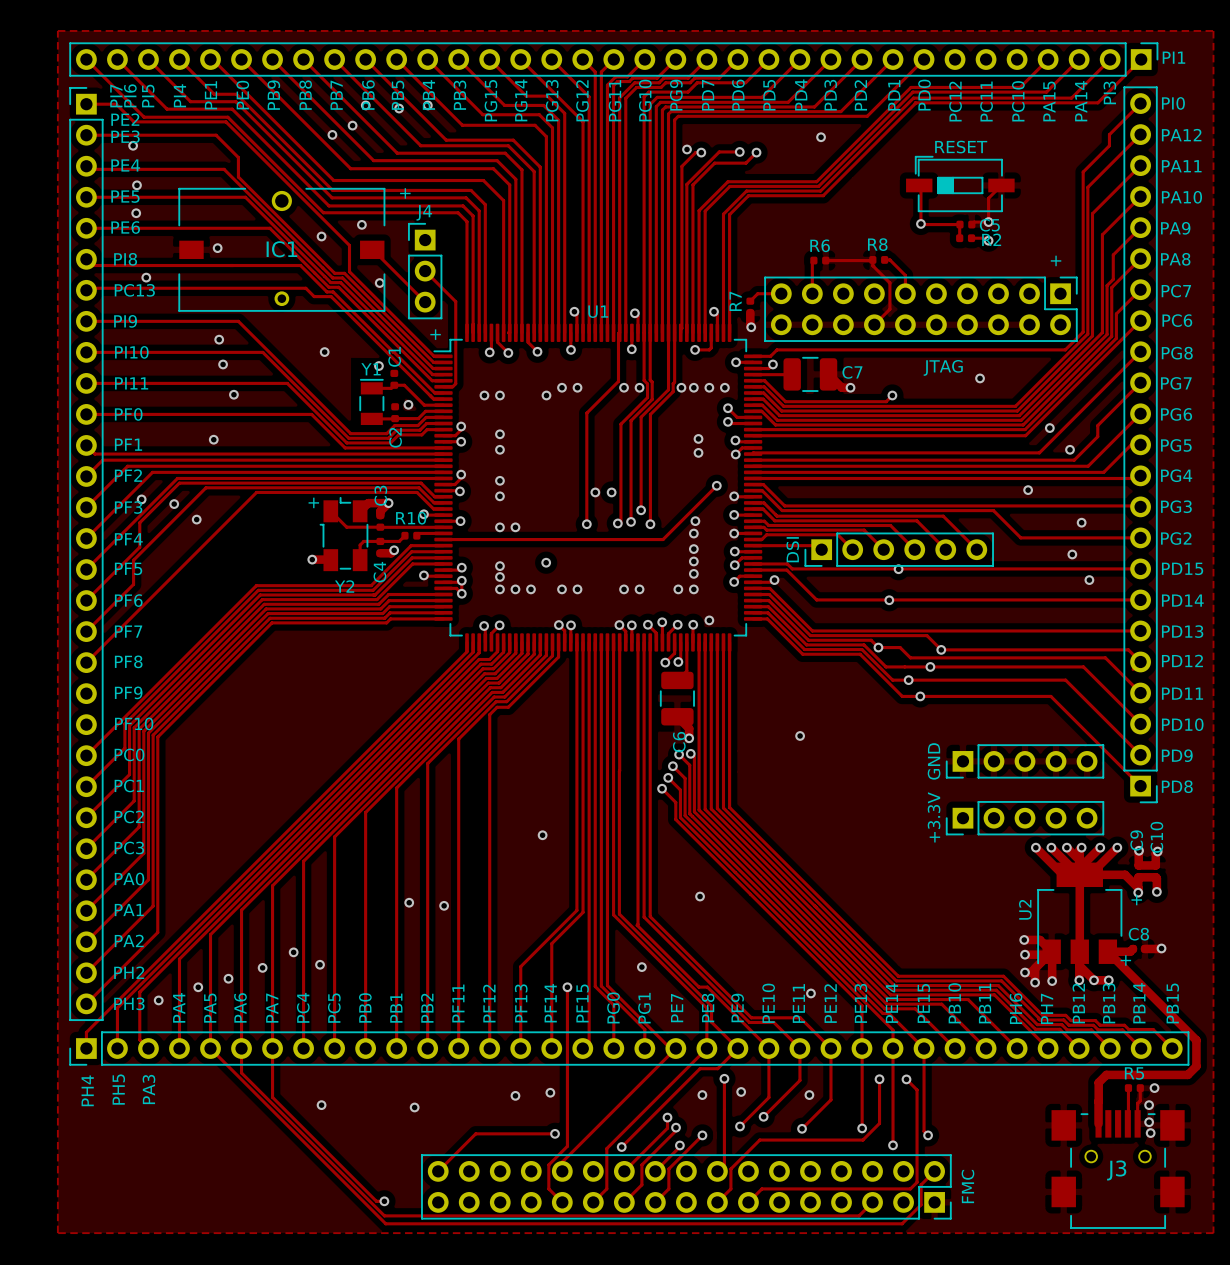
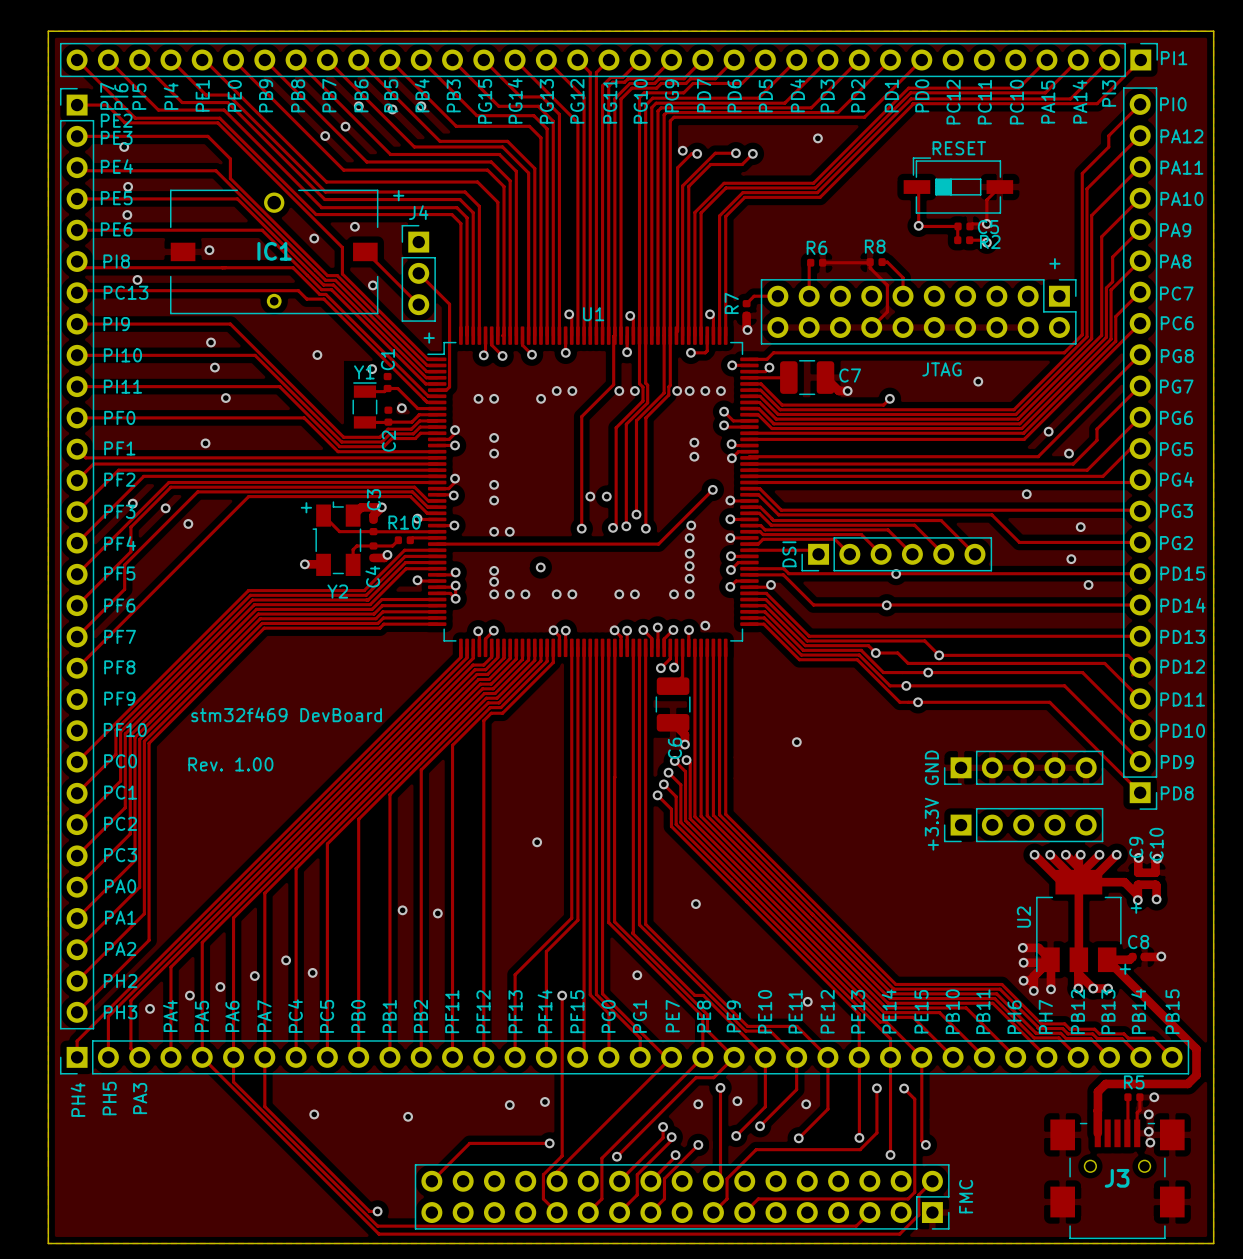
board edge: none -> (48, 31) (48, 1243) (1213, 1243) (1213, 31) (48, 31)
text: none -> stm32f469 DevBoard (286, 714)
text: none -> Rev. 1.00 (230, 764)

